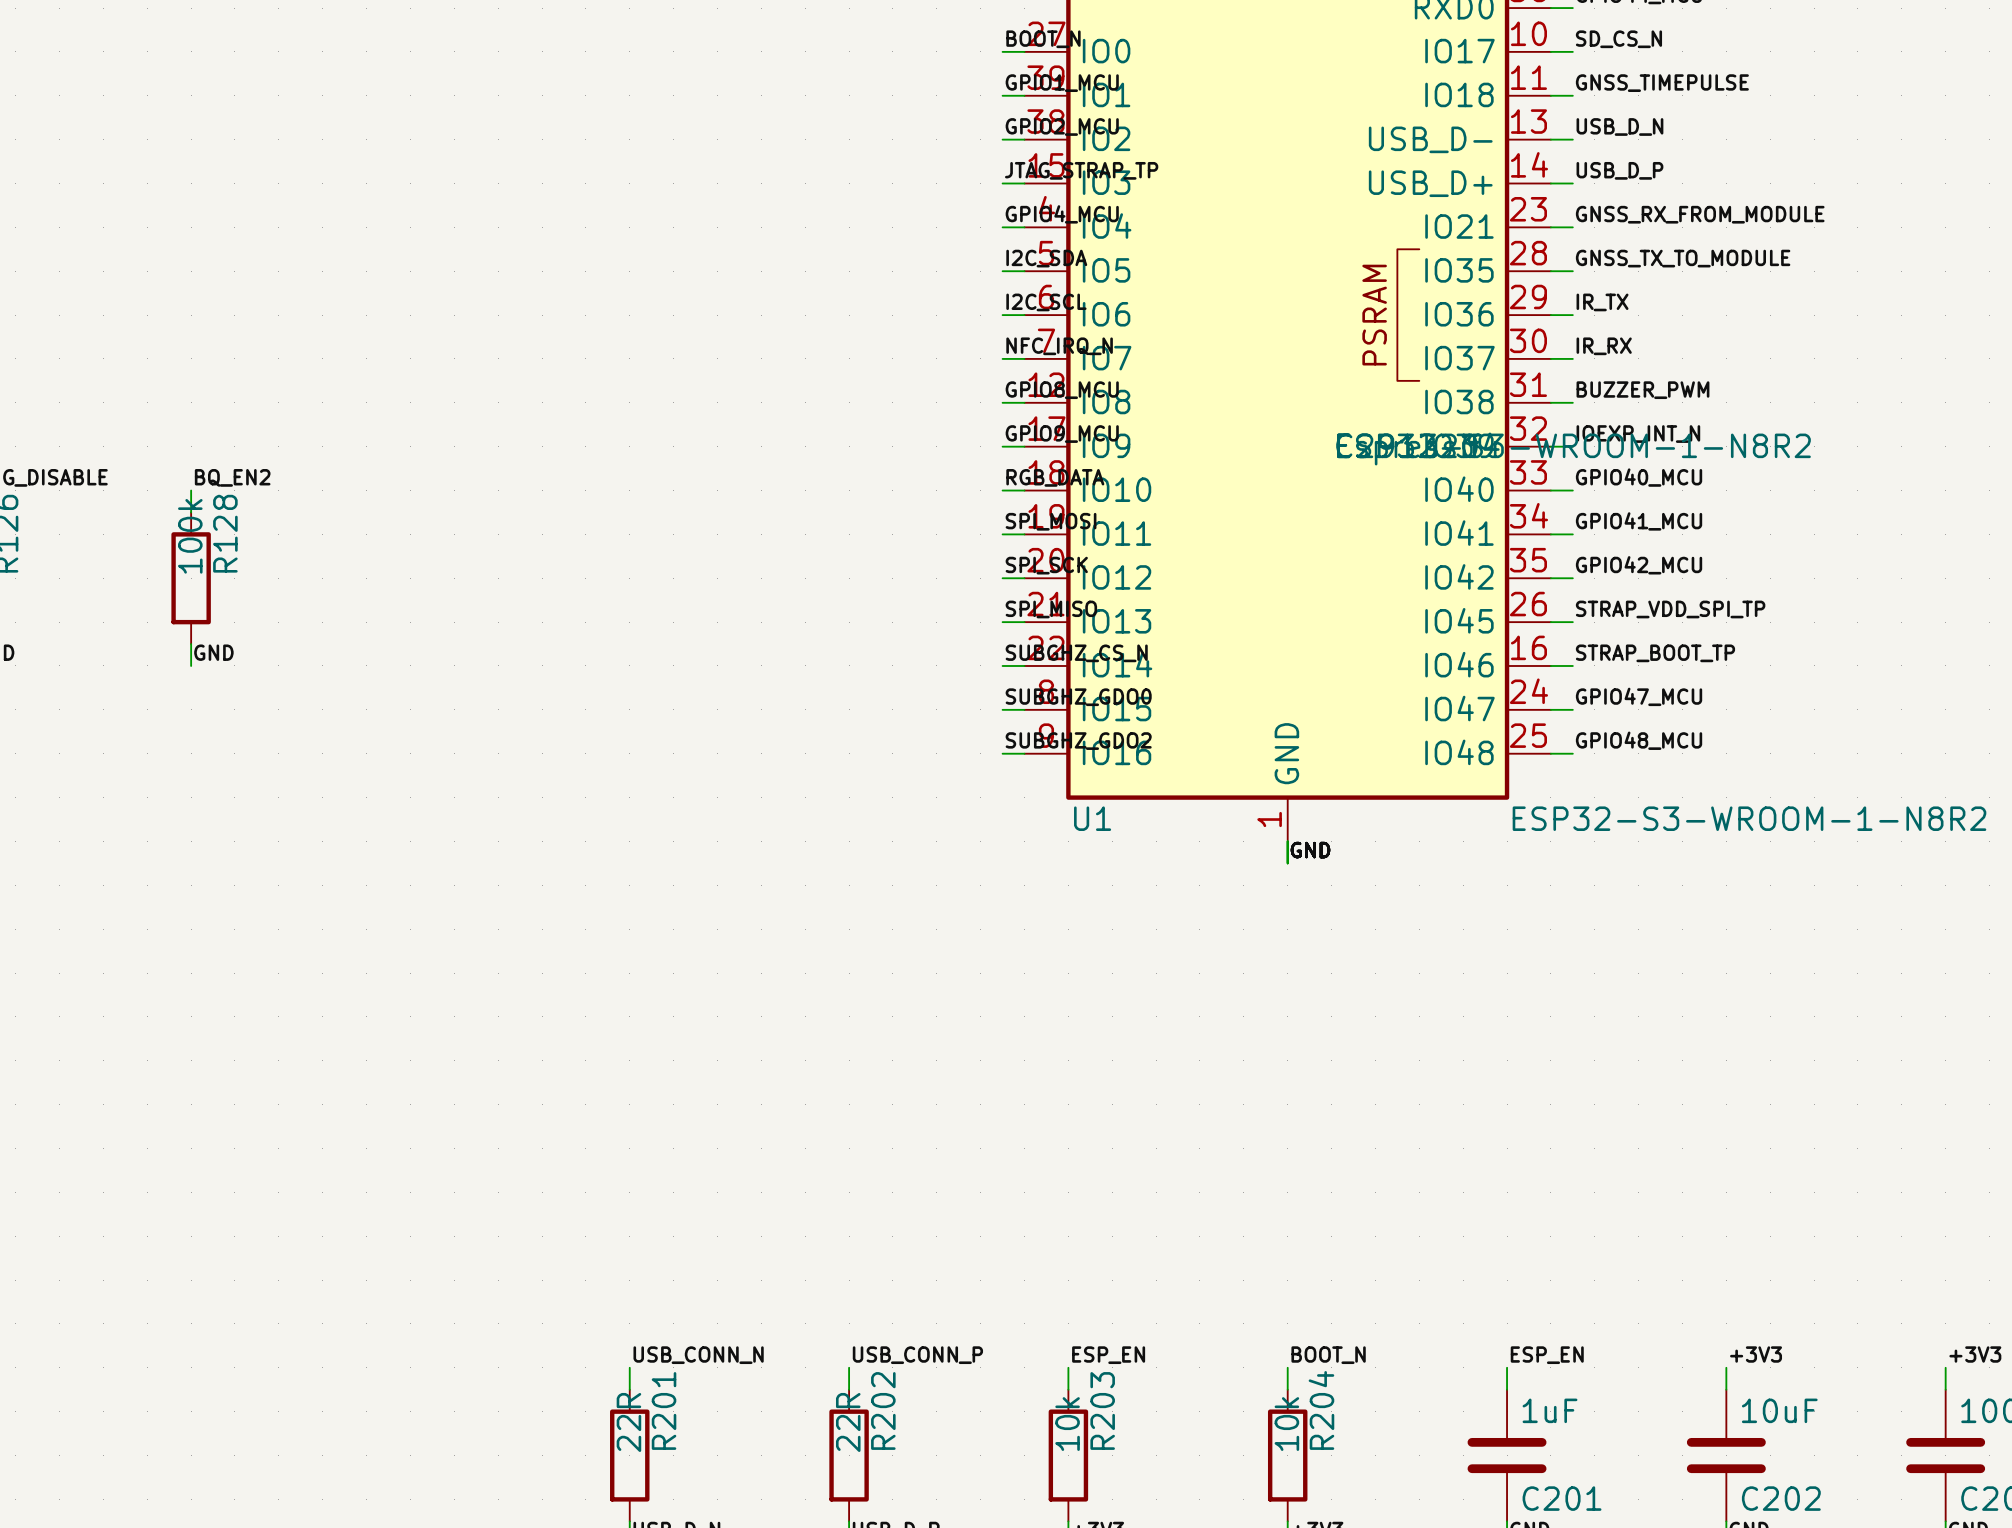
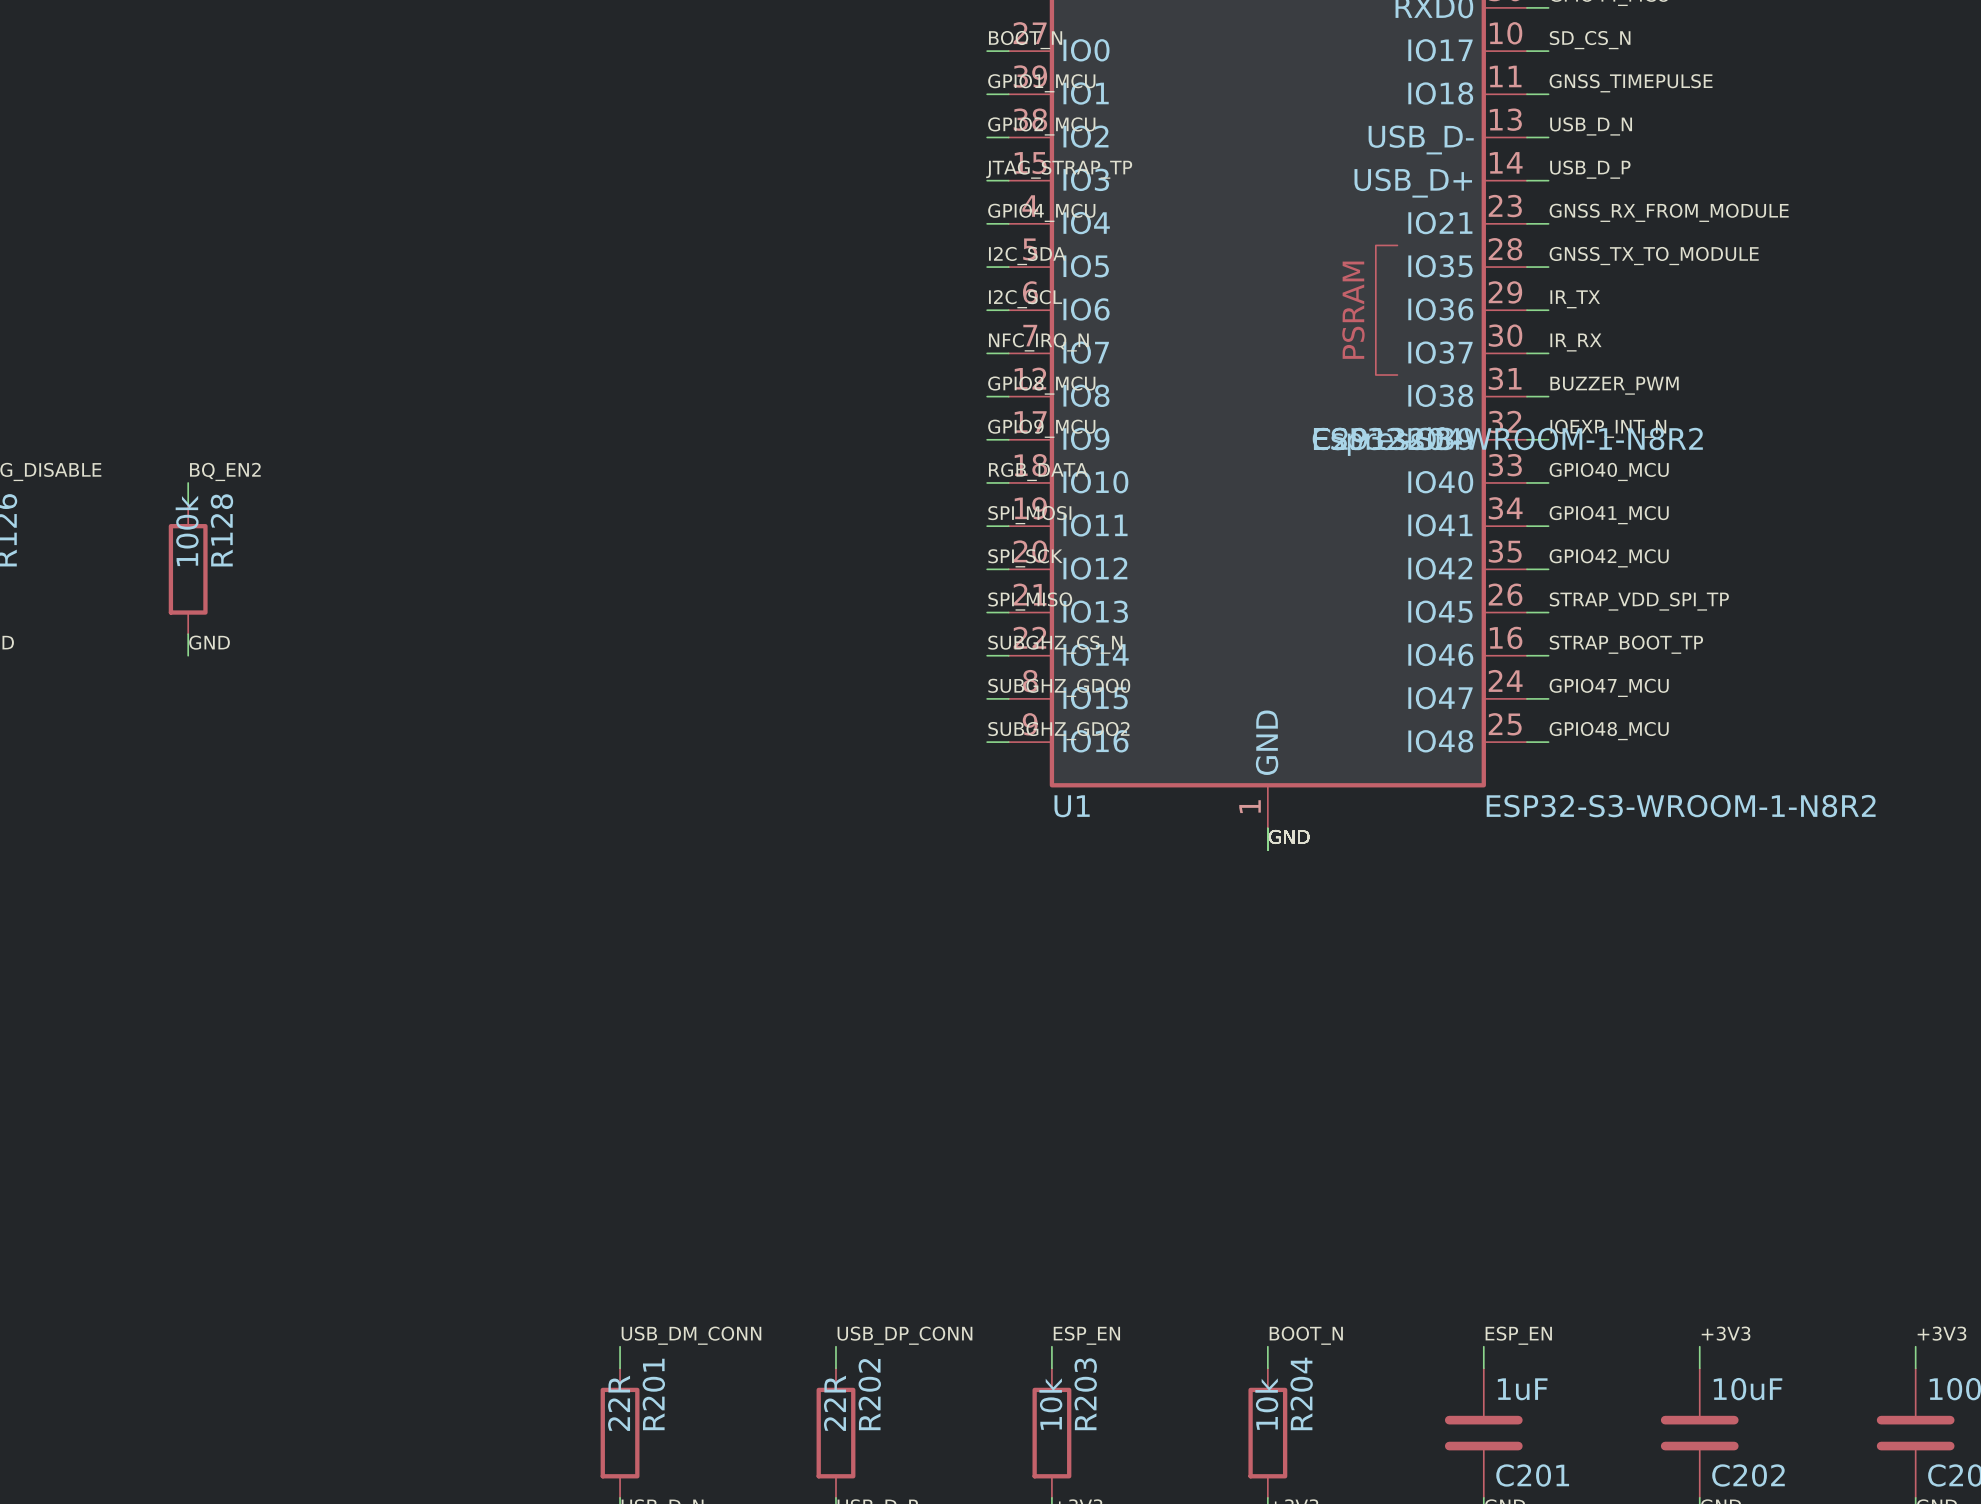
label: USB_CONN_N (698, 1355) -> USB_DM_CONN (691, 1335)
label: USB_CONN_P (917, 1355) -> USB_DP_CONN (904, 1335)

